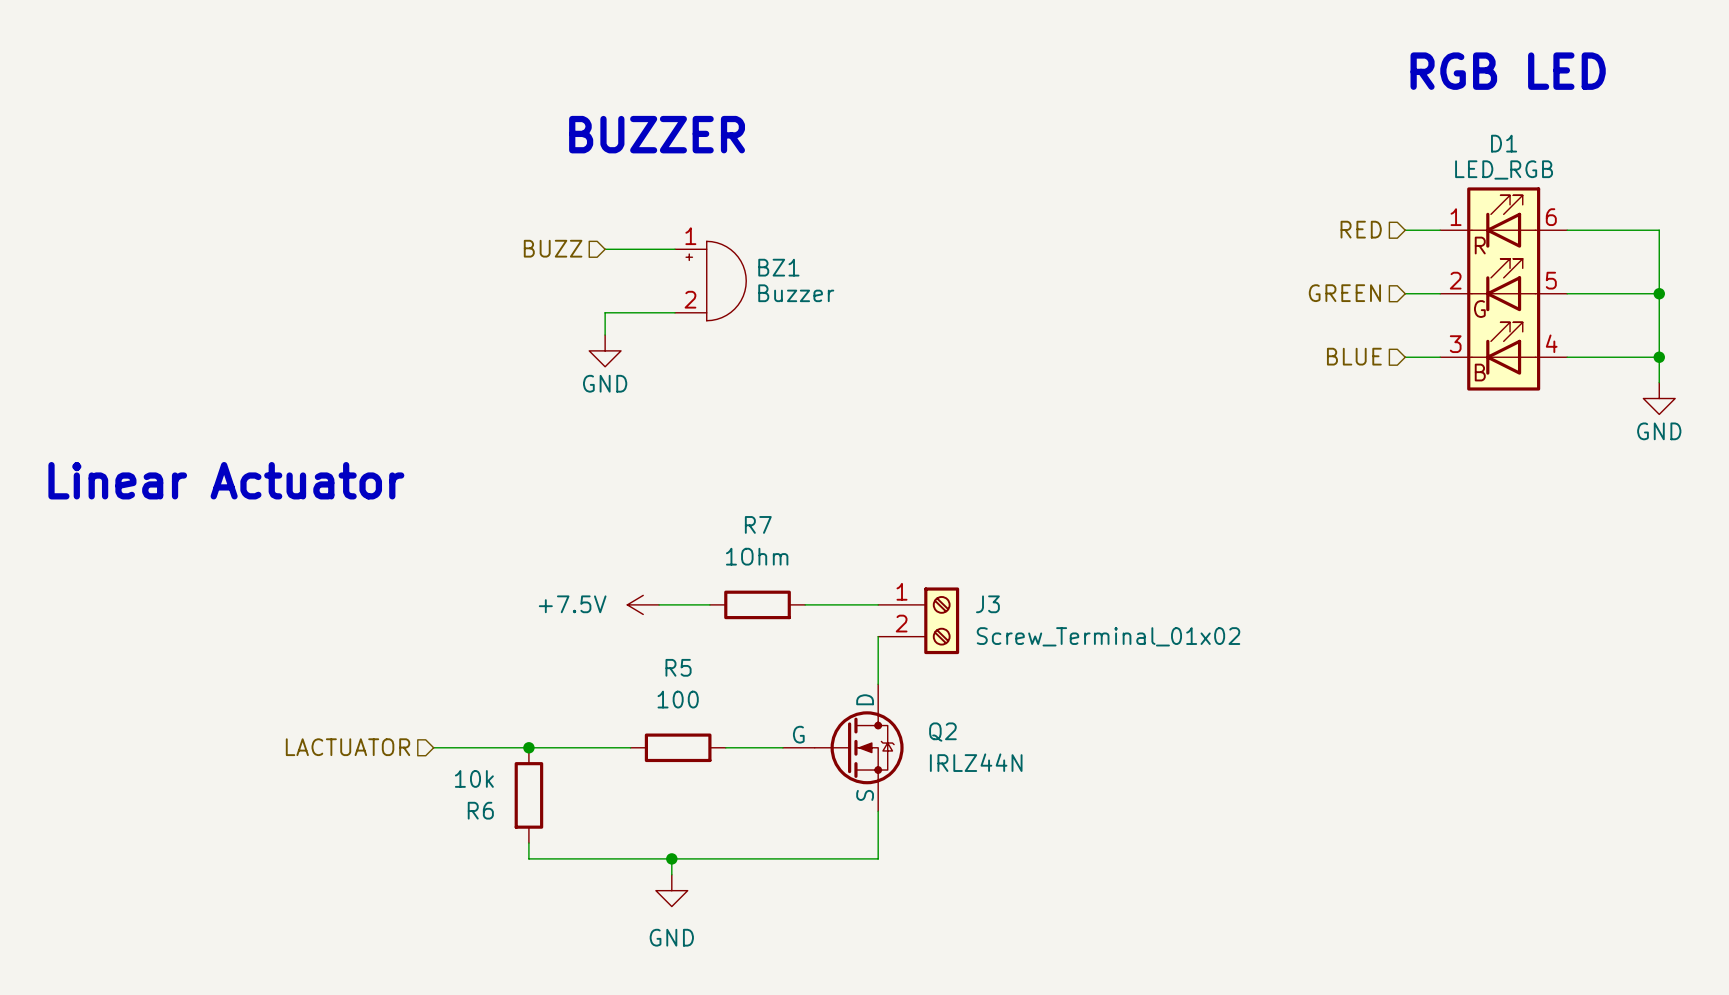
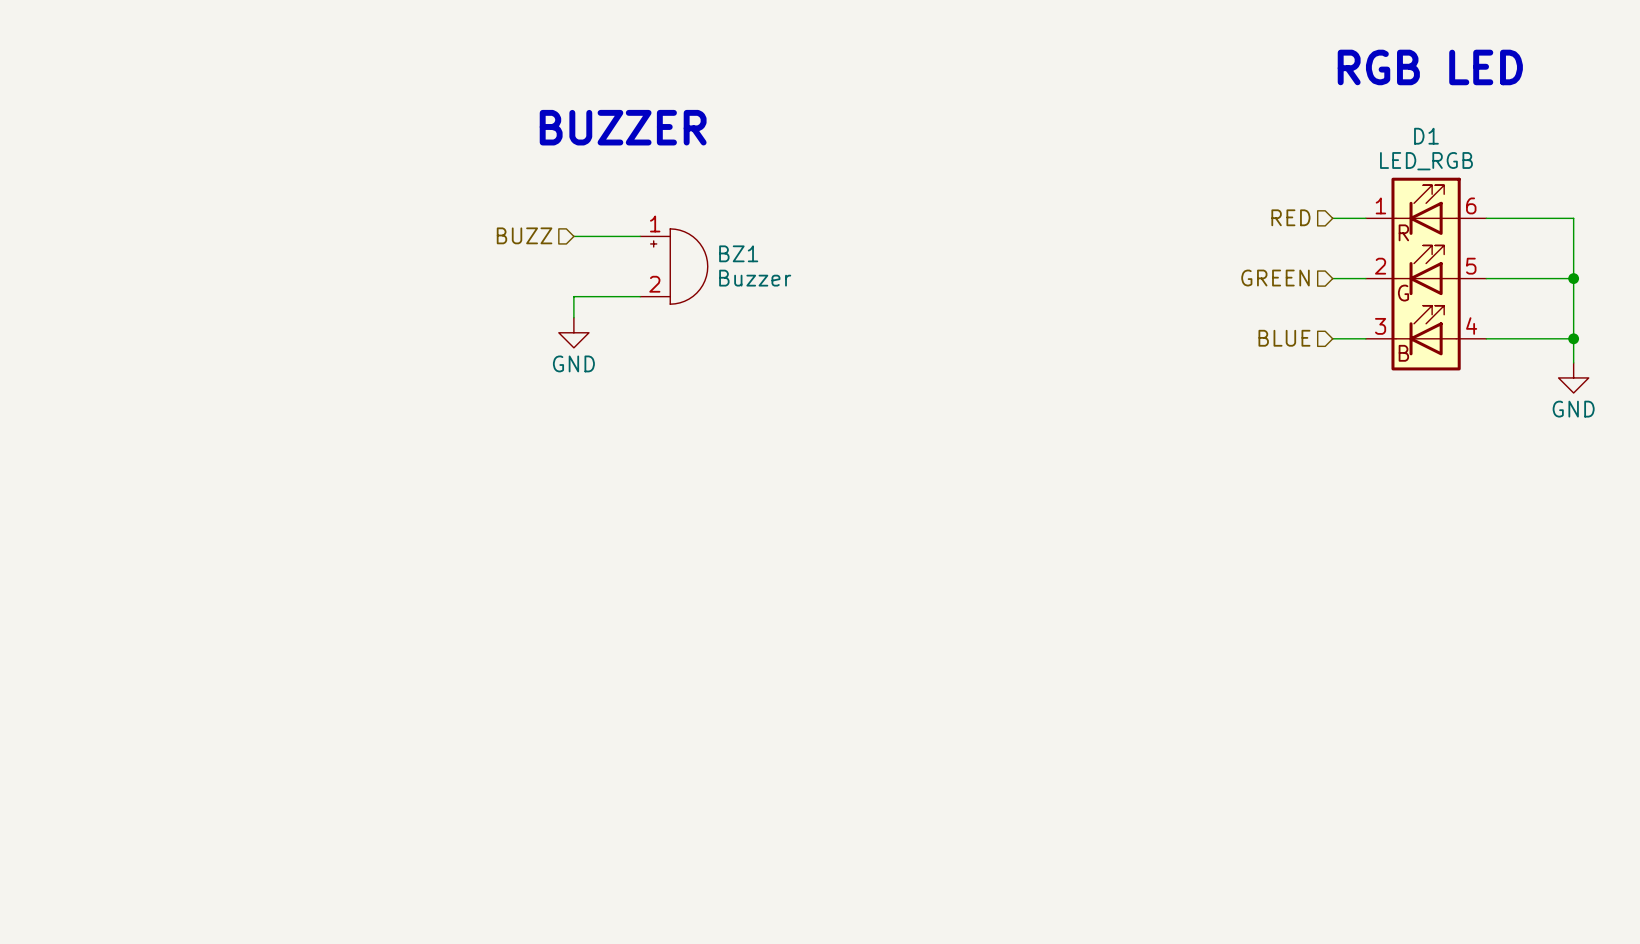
text: Linear Actuator (226, 480) -> none
power symbol: +7.5V (643, 604) -> none
wire: (659, 604) (709, 604) -> none
R7: 1Ohm (757, 604) -> none
wire: (805, 604) (878, 604) -> none
J3: Screw_Terminal_01x02 (918, 620) -> none
wire: (878, 636) (878, 684) -> none
hierarchical label: LACTUATOR (348, 747) -> none
wire: (433, 747) (630, 747) -> none
junction: (528, 747) -> none
R5: 100 (678, 747) -> none
wire: (725, 747) (782, 747) -> none
Q2: IRLZ44N (843, 747) -> none
R6: 10k (528, 795) -> none
wire: (878, 811) (878, 858) (528, 858) (528, 843) -> none
wire: (671, 858) (671, 874) -> none
junction: (671, 858) -> none
power symbol: GND (671, 890) -> none

